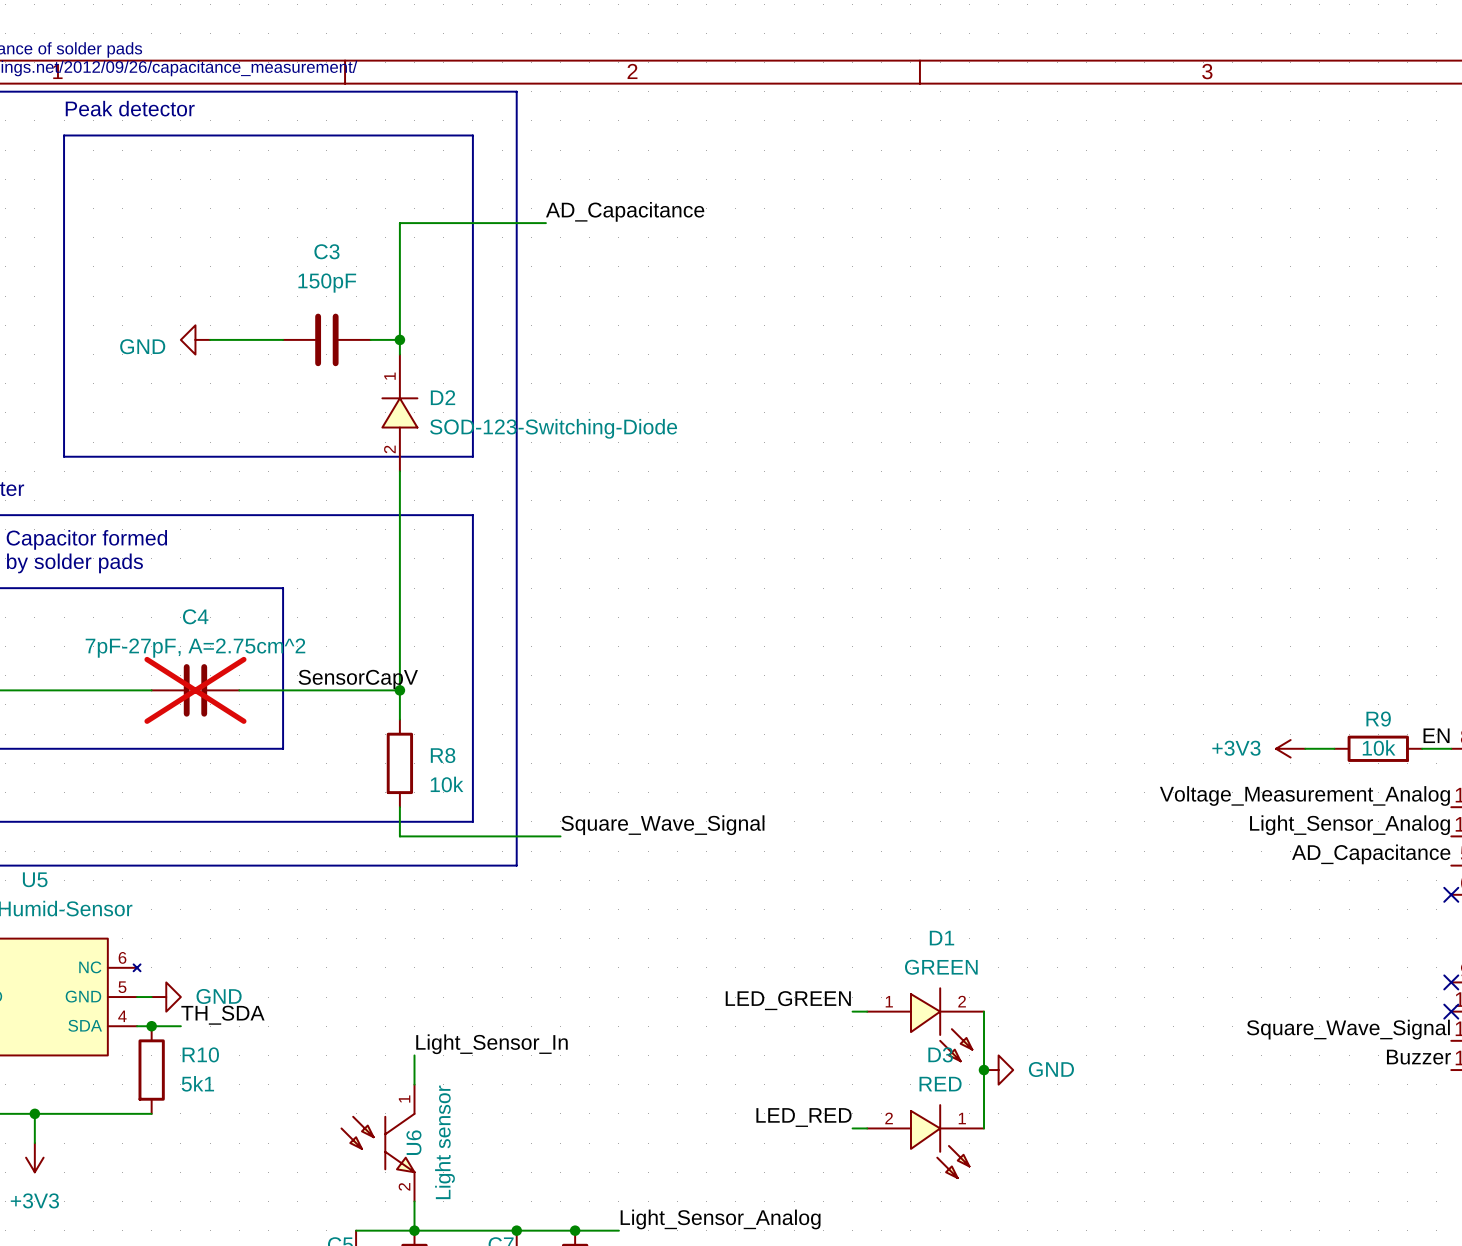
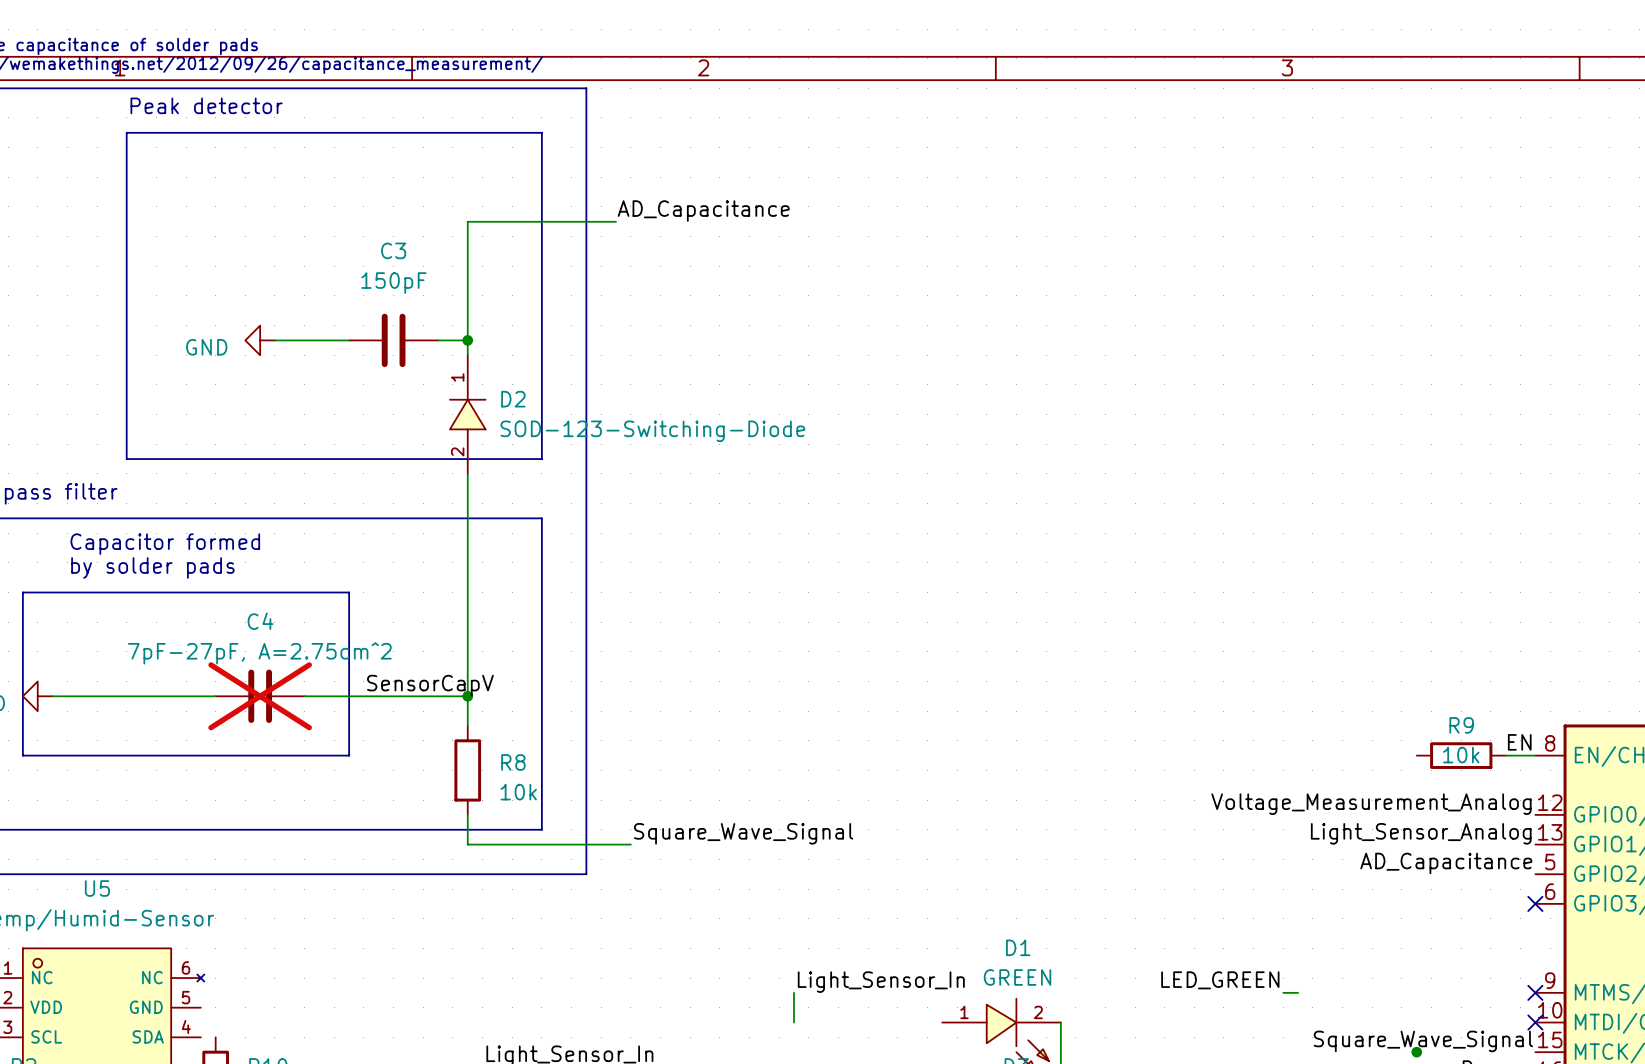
power symbol: +3V3 (1290, 748) -> none
wire: (1305, 748) (1334, 748) -> none
label: none -> Light_Sensor_In (881, 982)
label: none -> LED_GREEN (1220, 980)
wire: none -> (793, 992) (793, 1022)
wire: none -> (1283, 992) (1298, 992)
wire: (137, 997) (151, 997) -> none
power symbol: GND (166, 997) -> none
label: LED_GREEN (788, 1000) -> none
wire: (852, 1011) (867, 1011) -> none
label: TH_SDA (222, 1015) -> none
wire: (137, 1026) (180, 1026) -> none
junction: (151, 1026) -> none
junction: none -> (1416, 1052)

